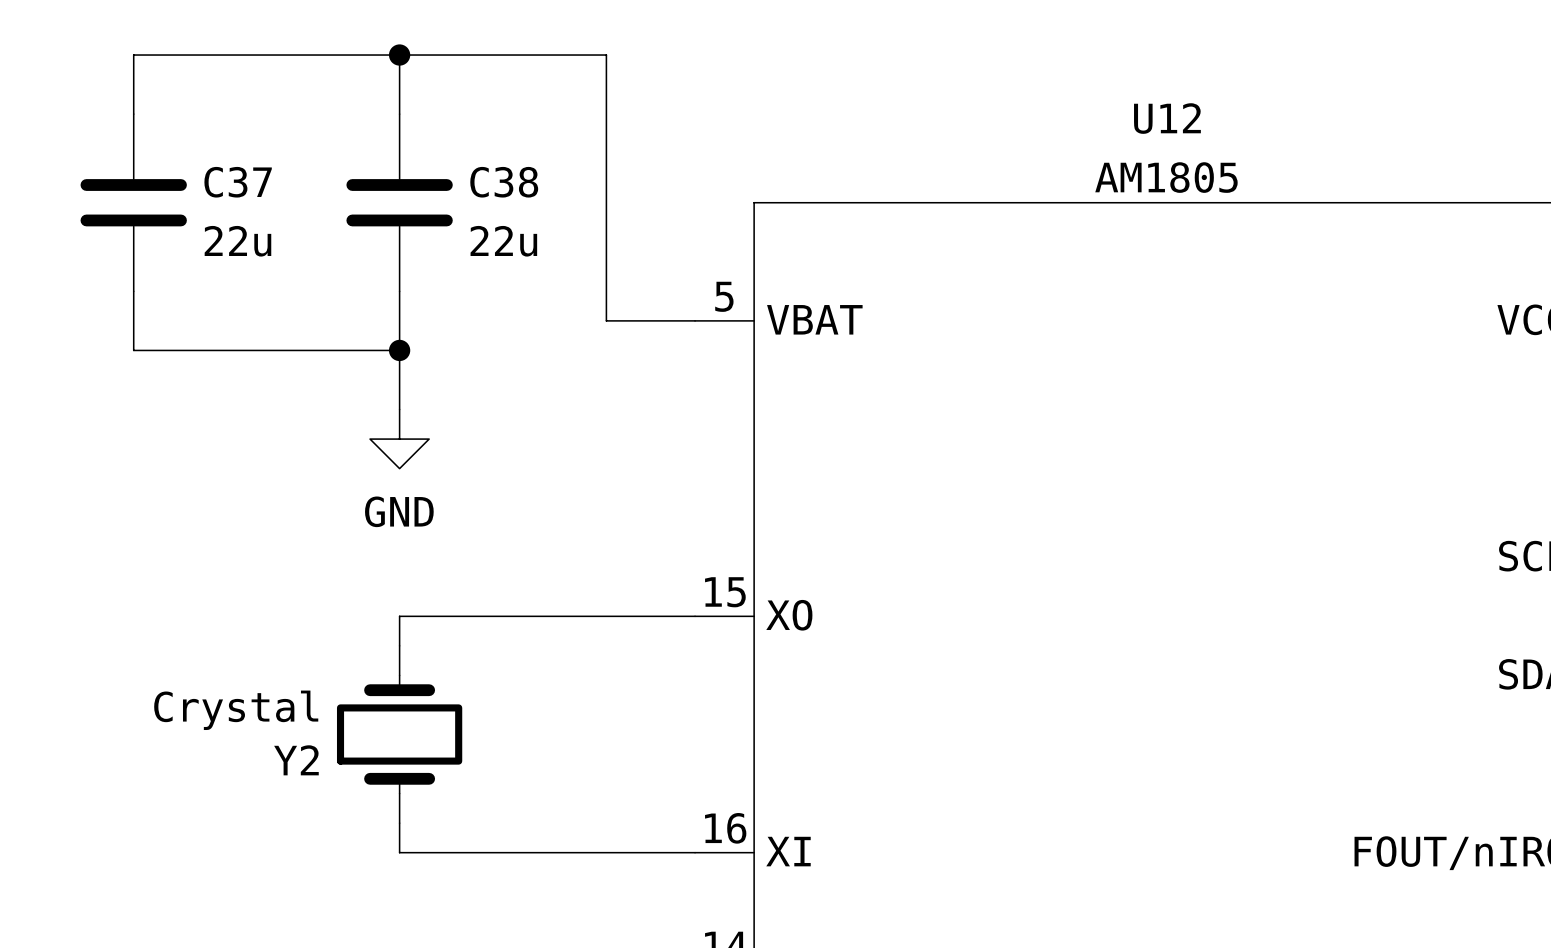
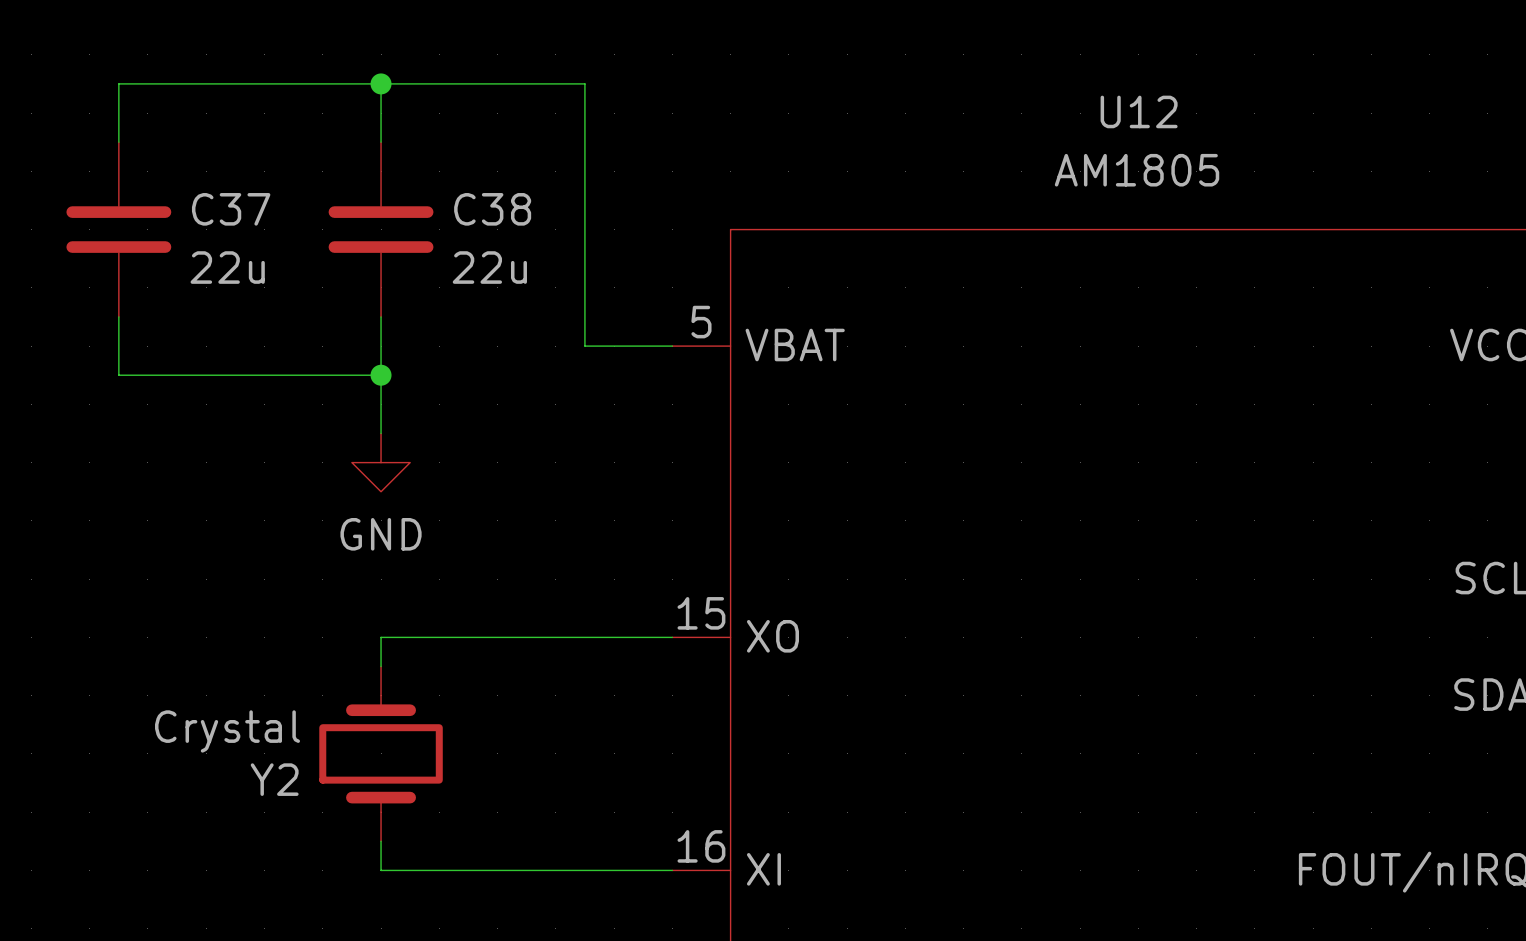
U12 name position: U12 (1167, 118) -> U12 (1139, 111)
U12 value position: AM1805 (1166, 177) -> AM1805 (1137, 170)

